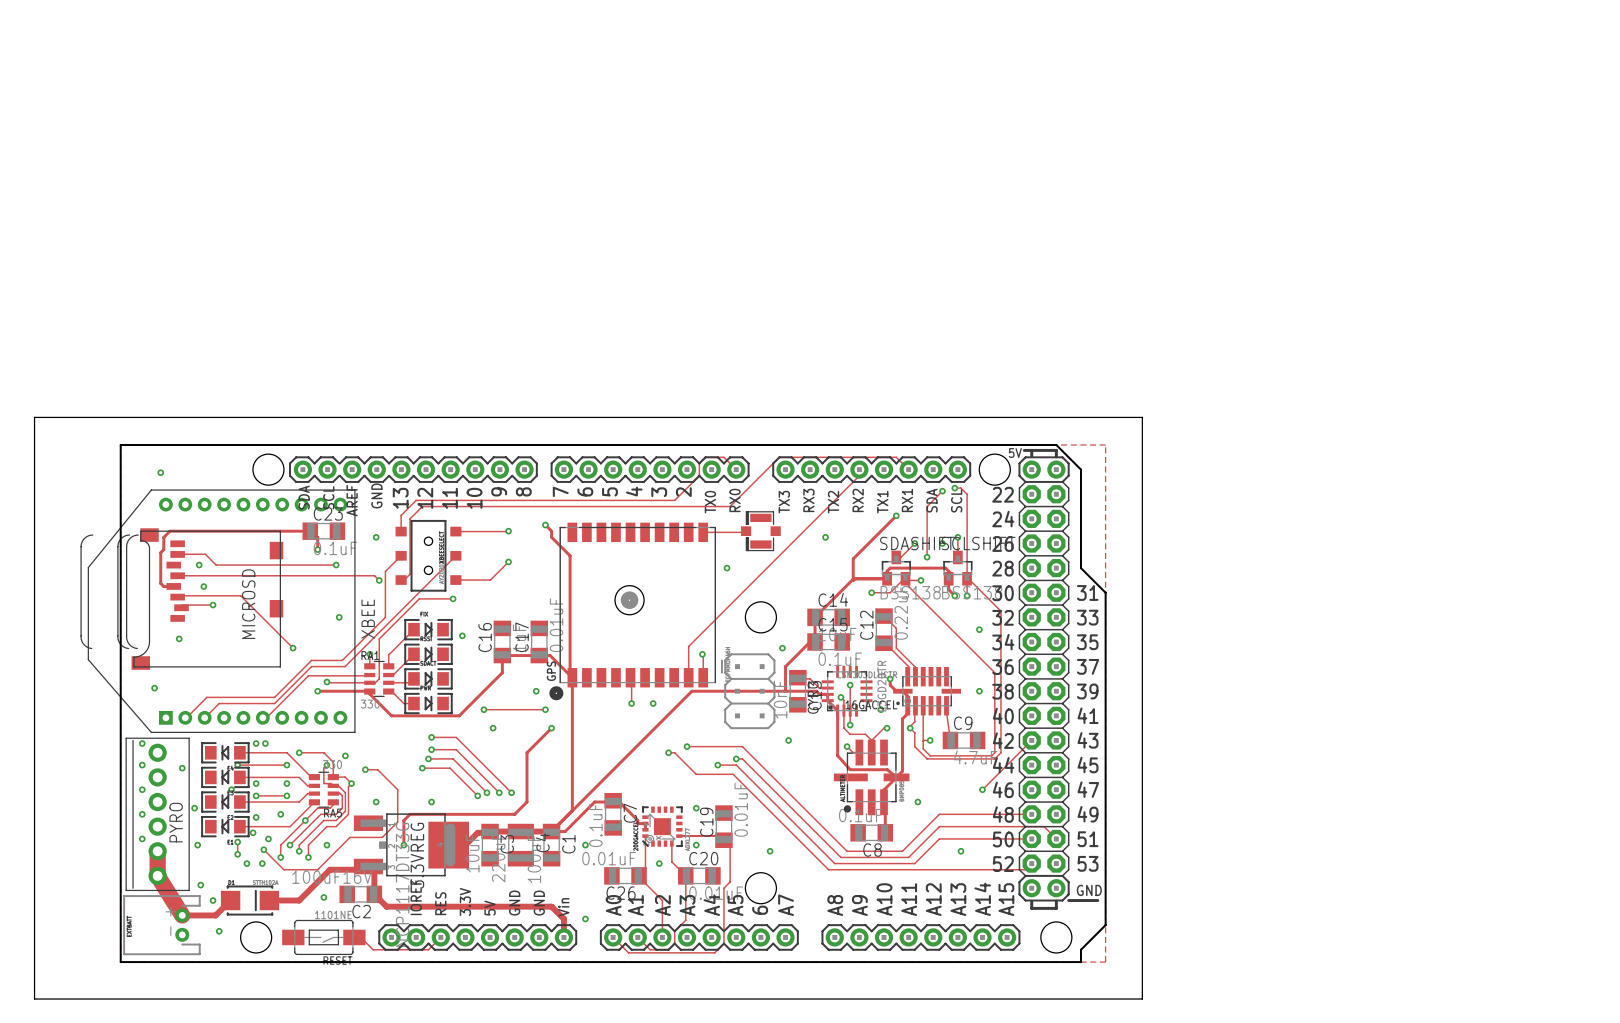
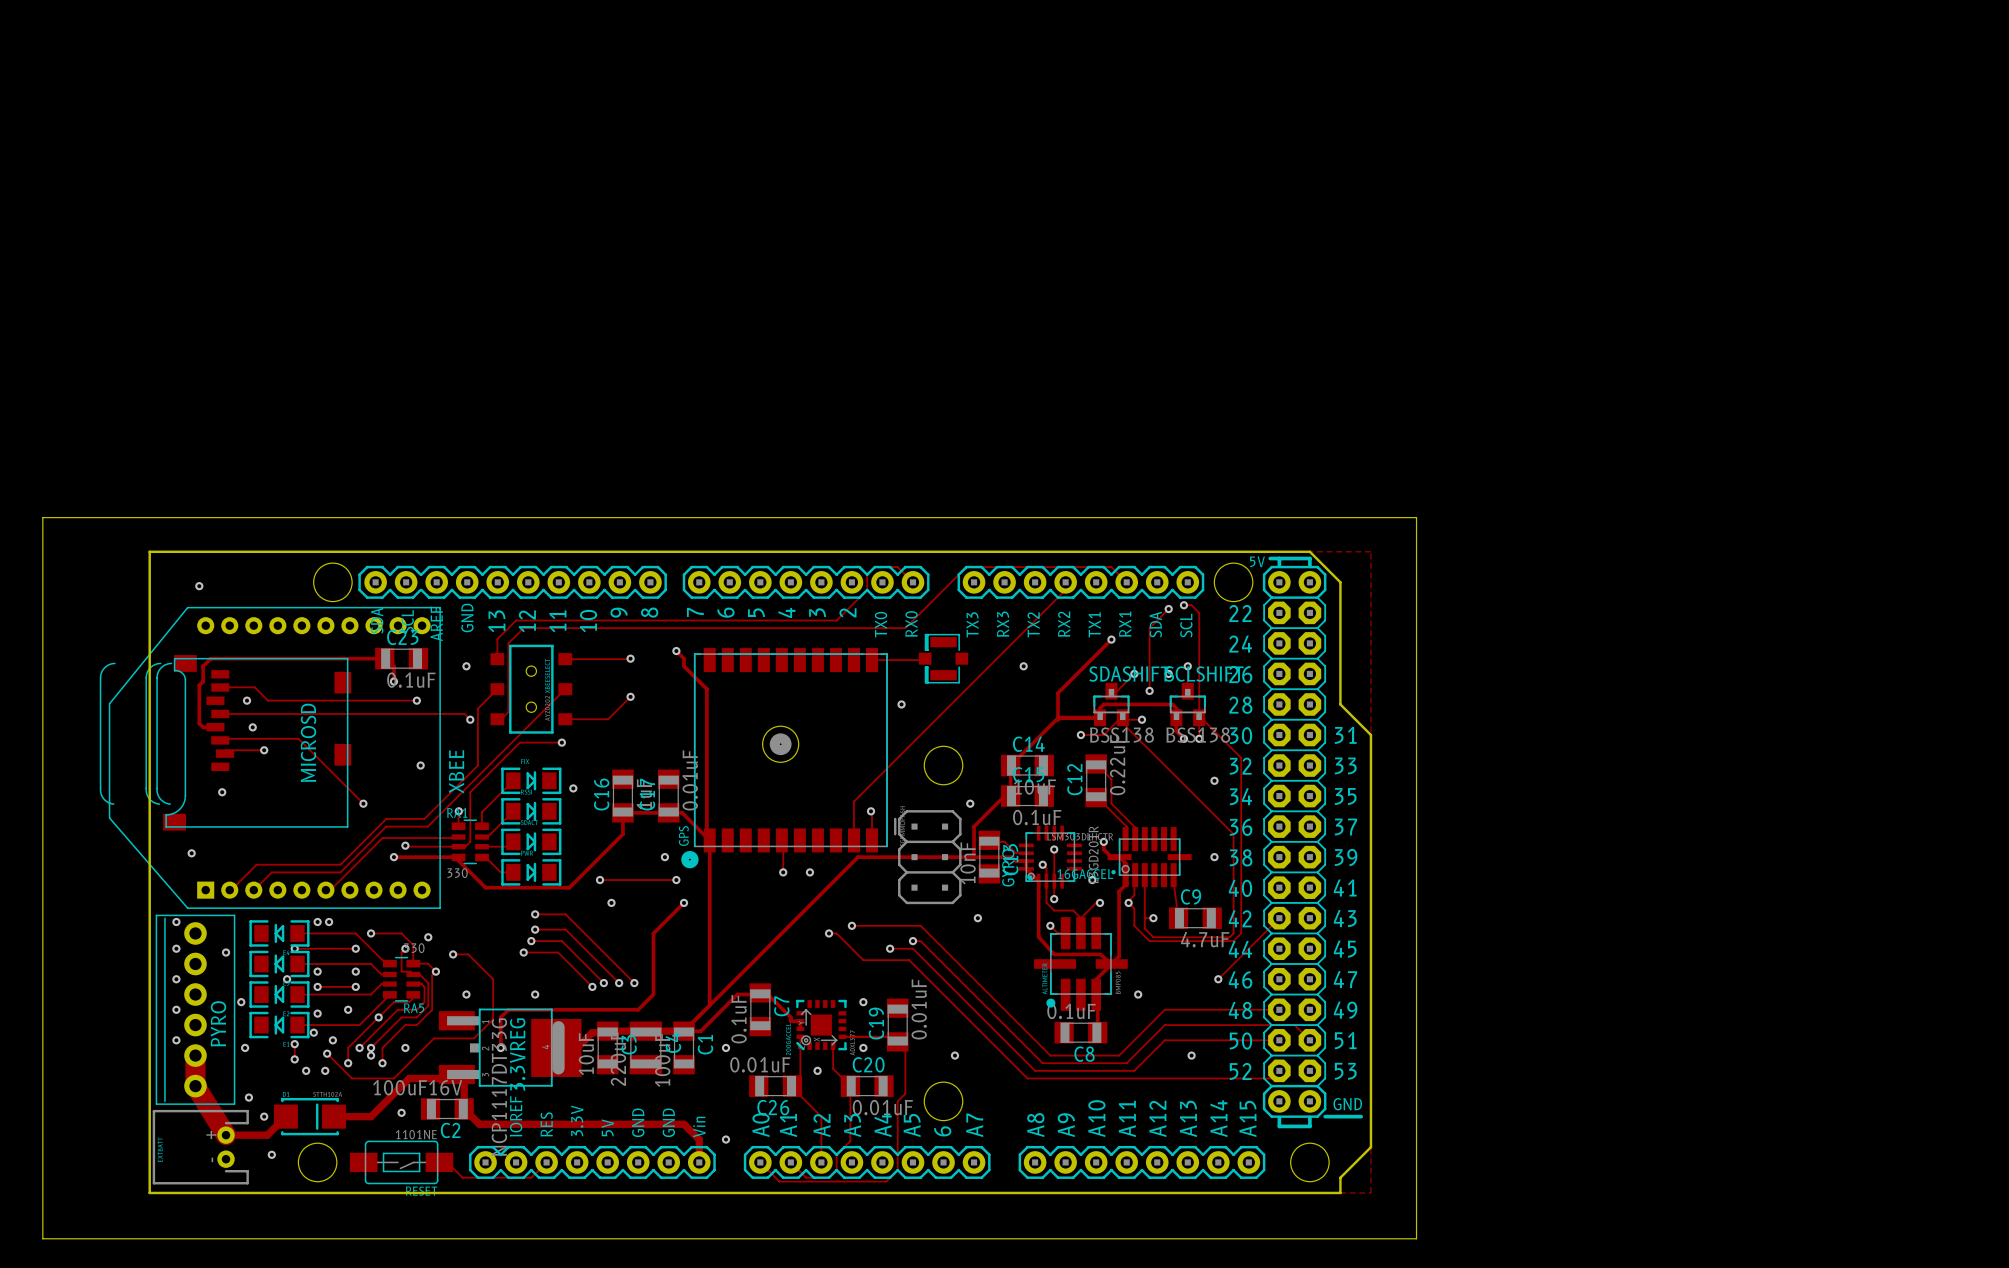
via: none -> (371, 1047)

